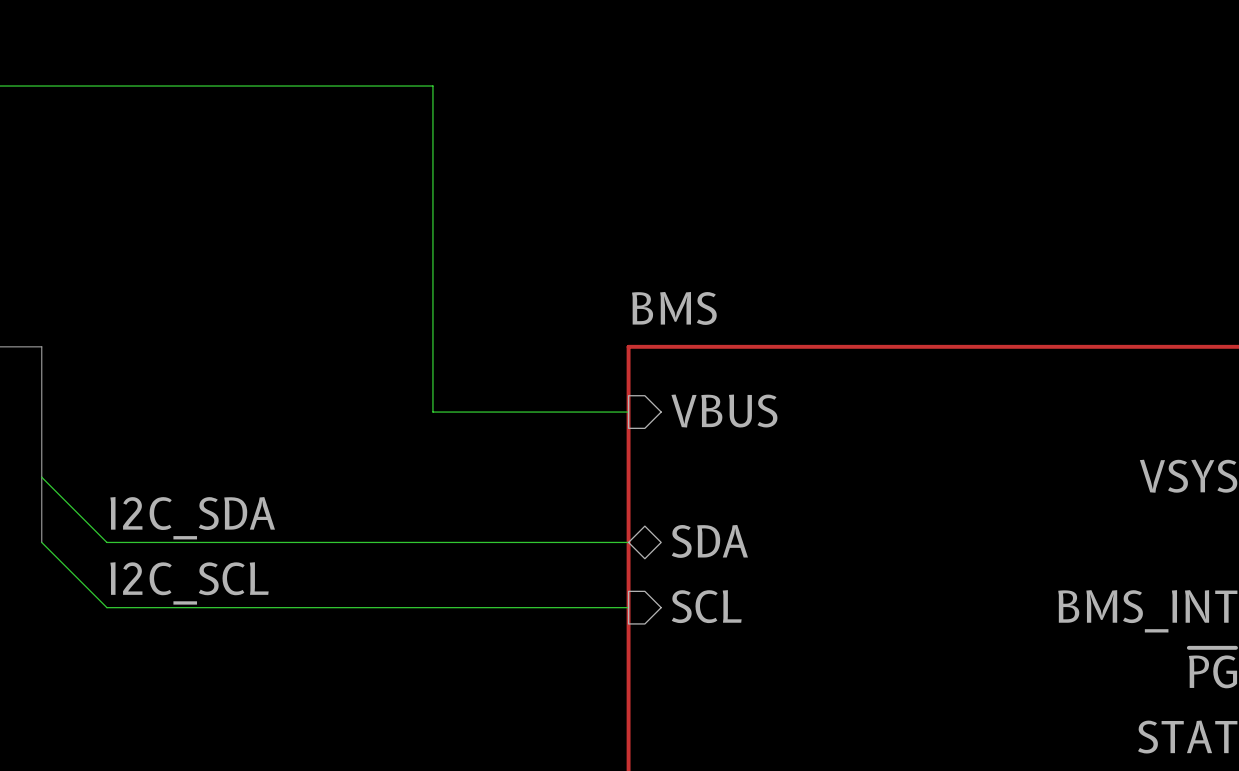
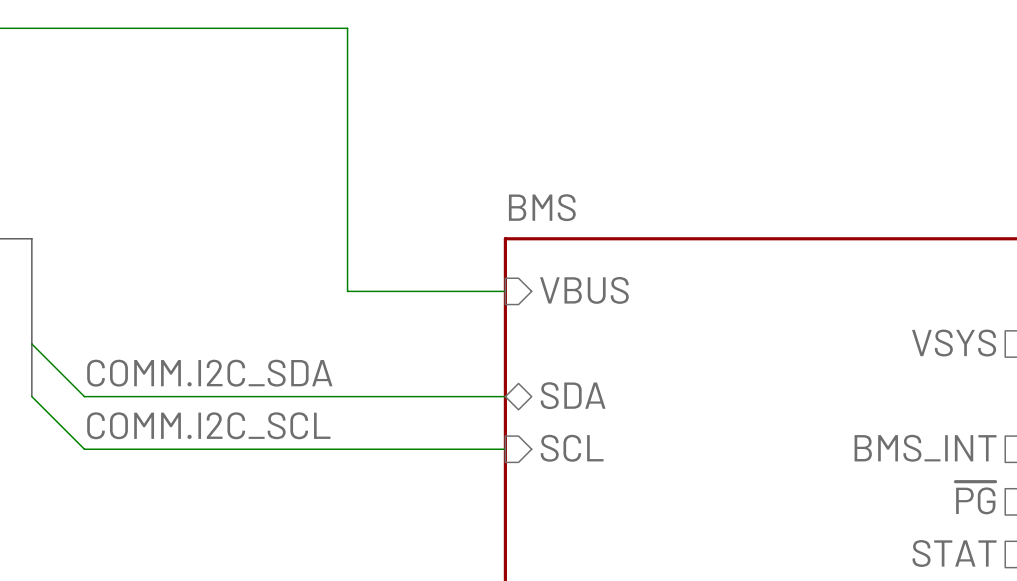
label: I2C_SDA (192, 518) -> COMM.I2C_SDA (209, 373)
label: I2C_SCL (189, 583) -> COMM.I2C_SCL (208, 425)

